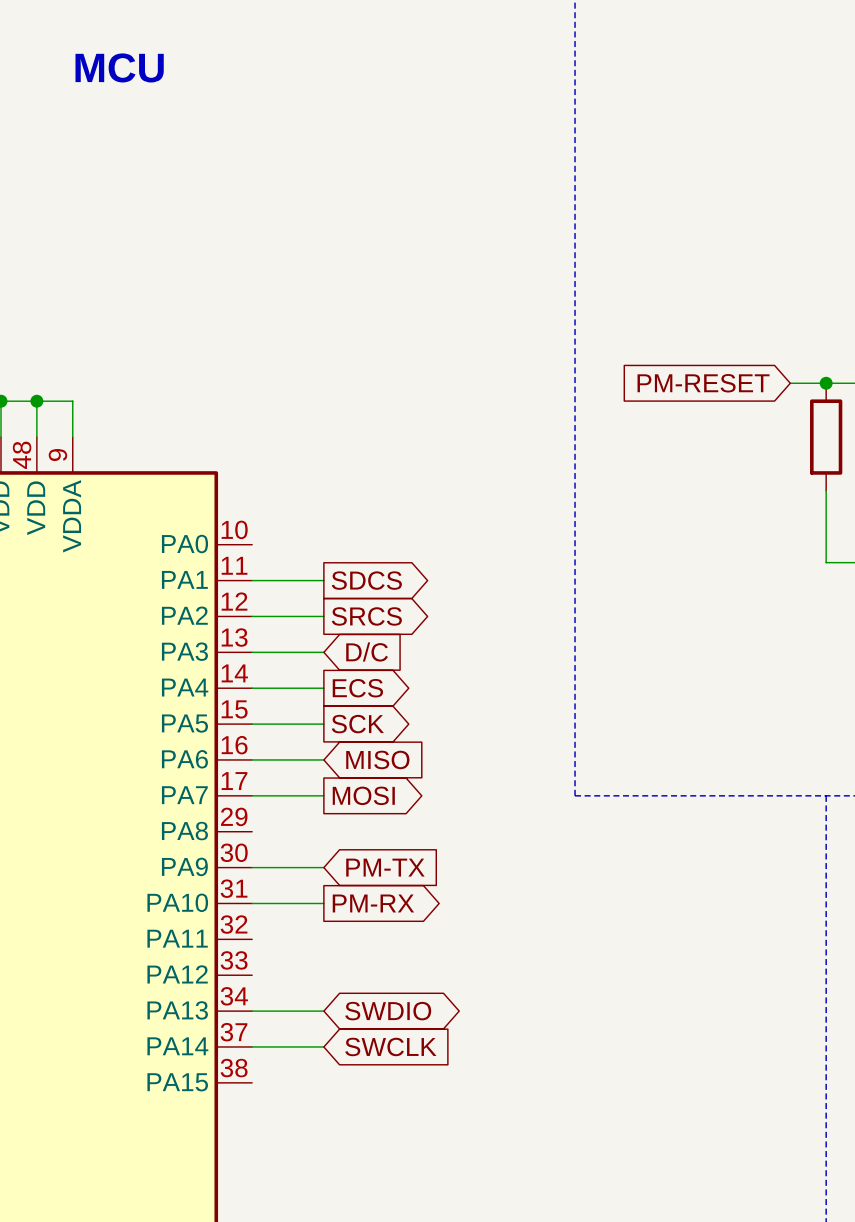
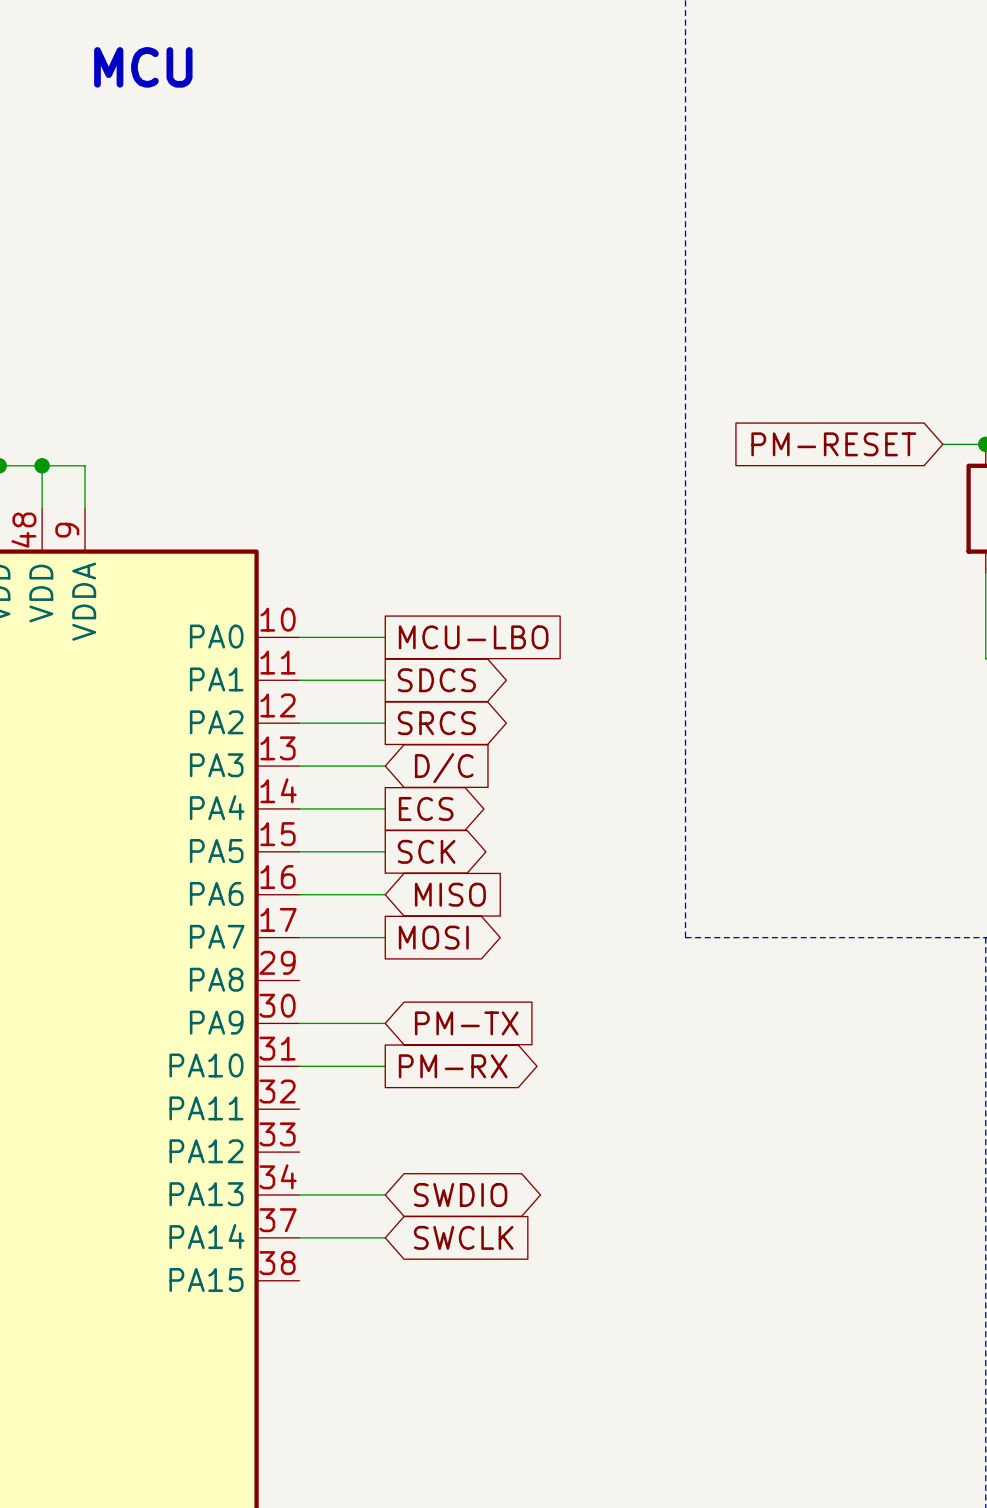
wire: none -> (299, 637) (385, 637)
global label: none -> MCU-LBO (473, 637)

